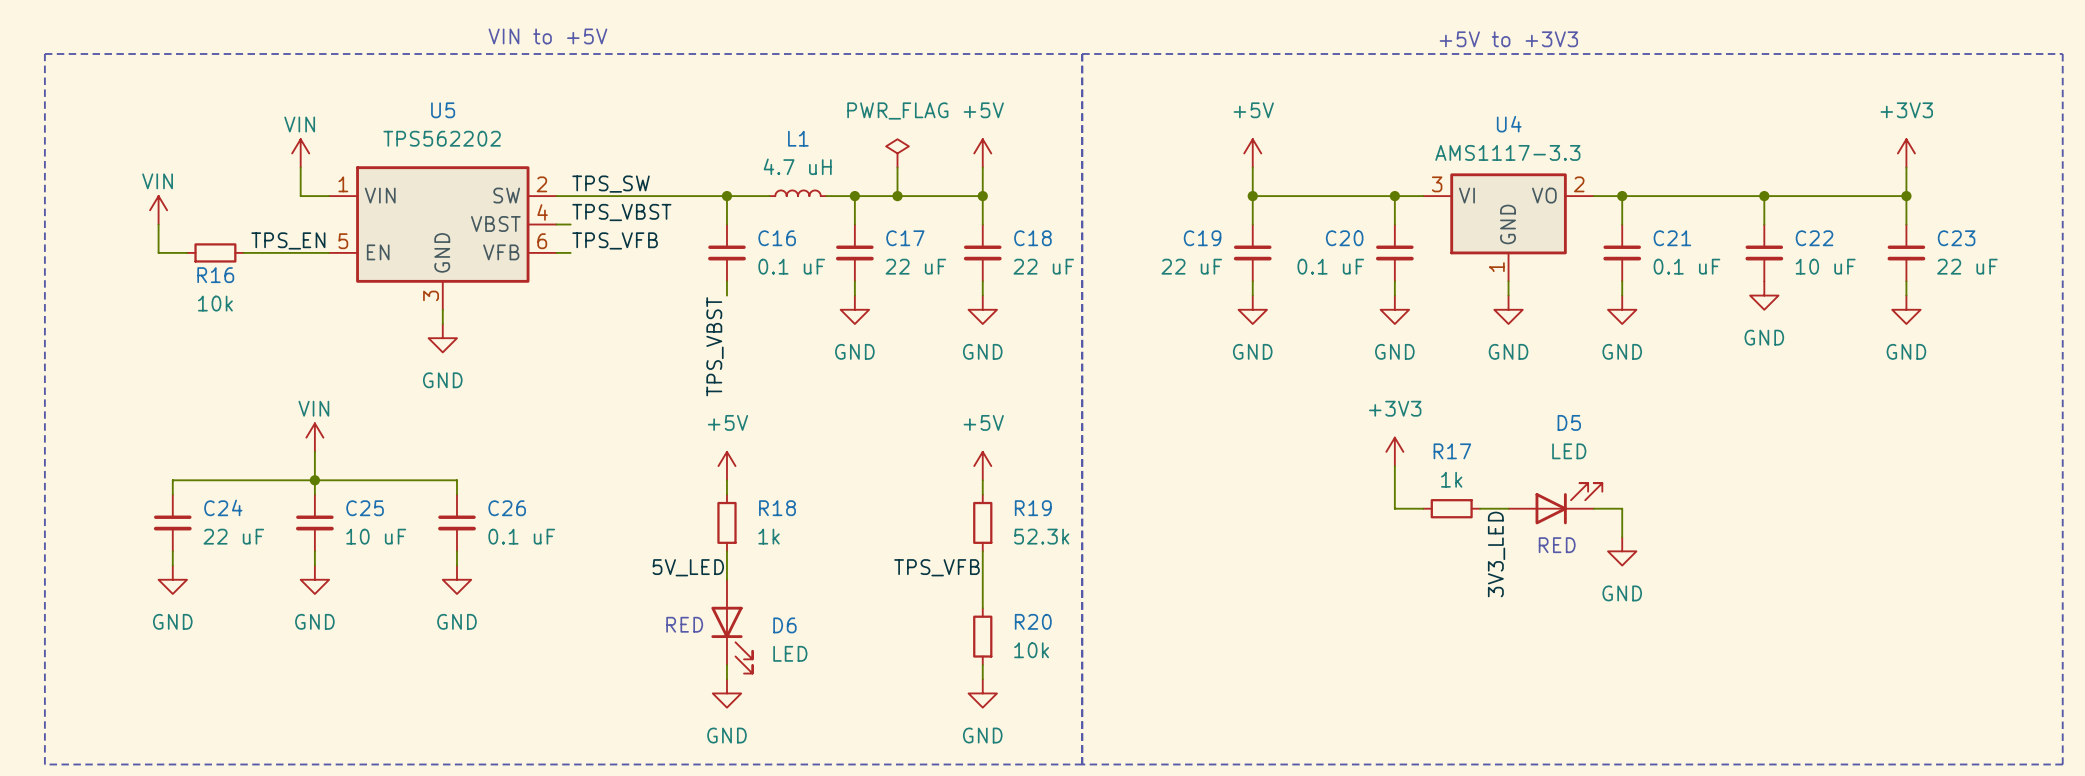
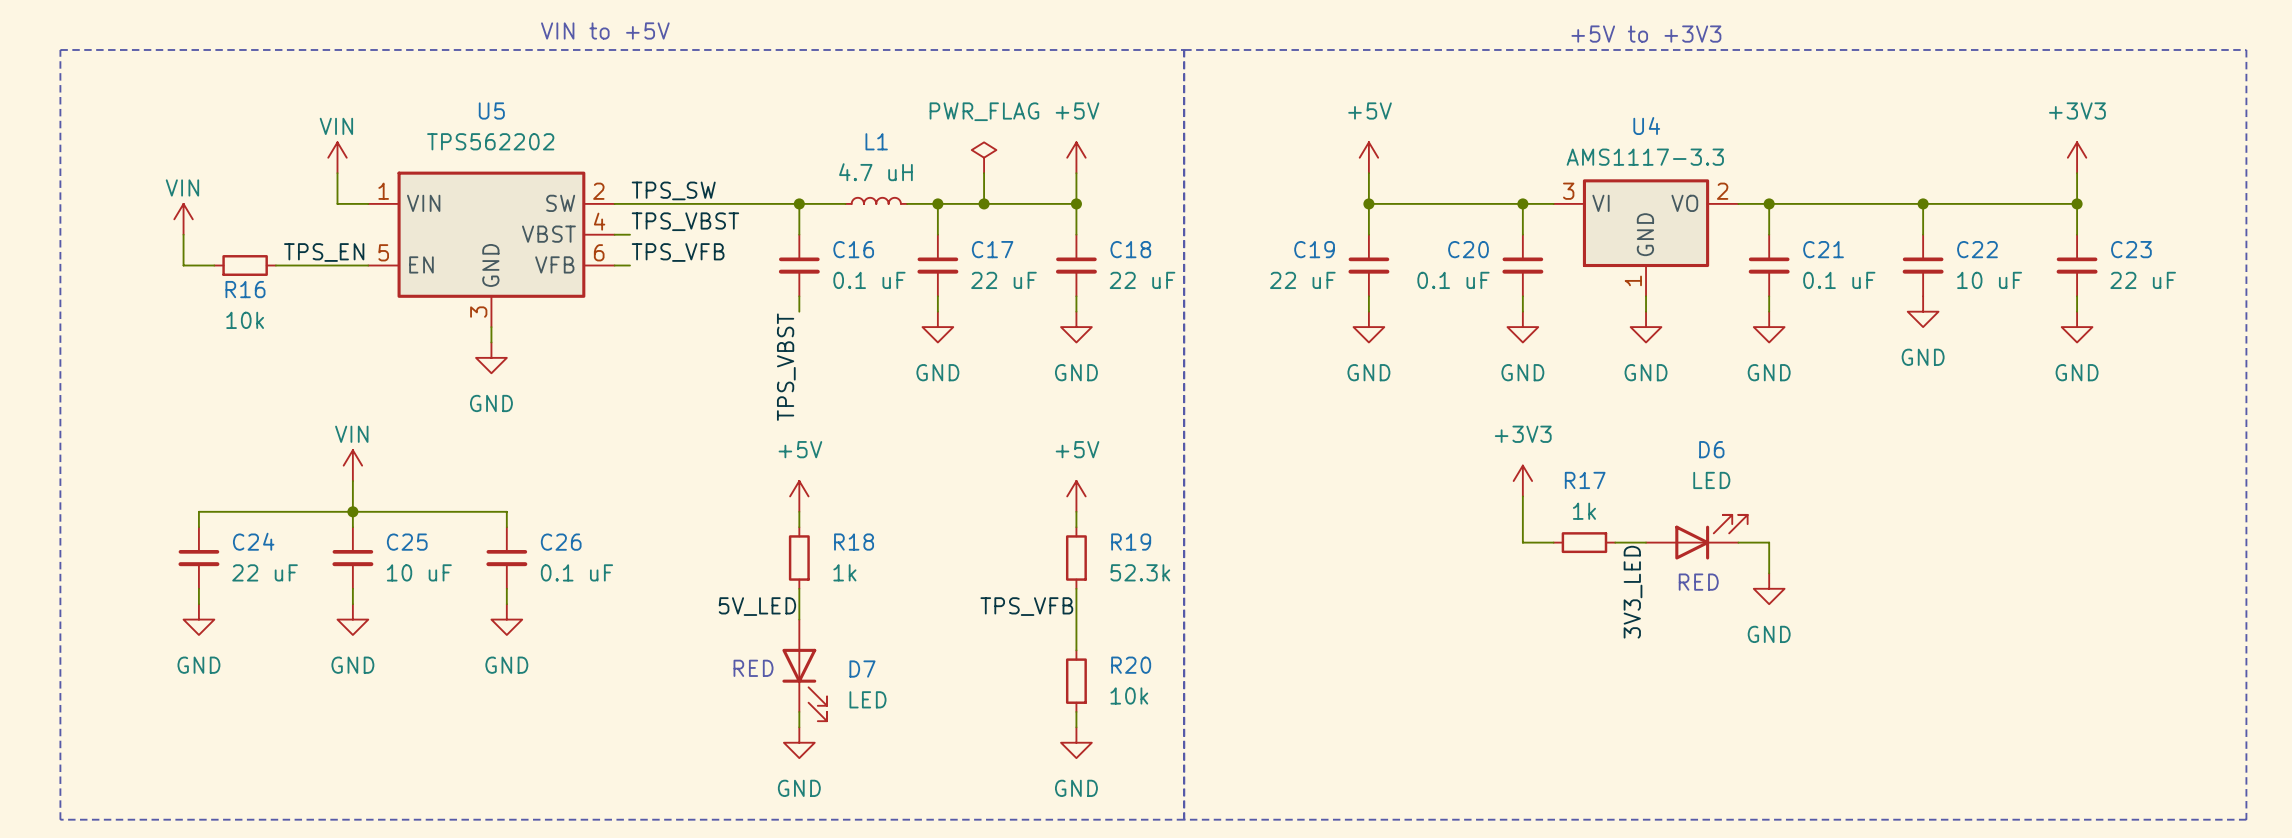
D5 name: D5 (1569, 422) -> D6 (1711, 449)
D6 name: D6 (784, 625) -> D7 (862, 669)

